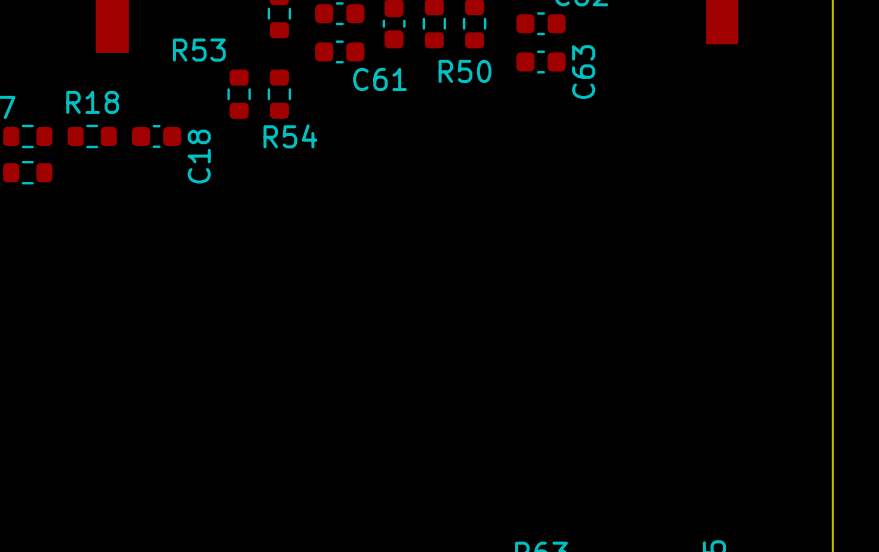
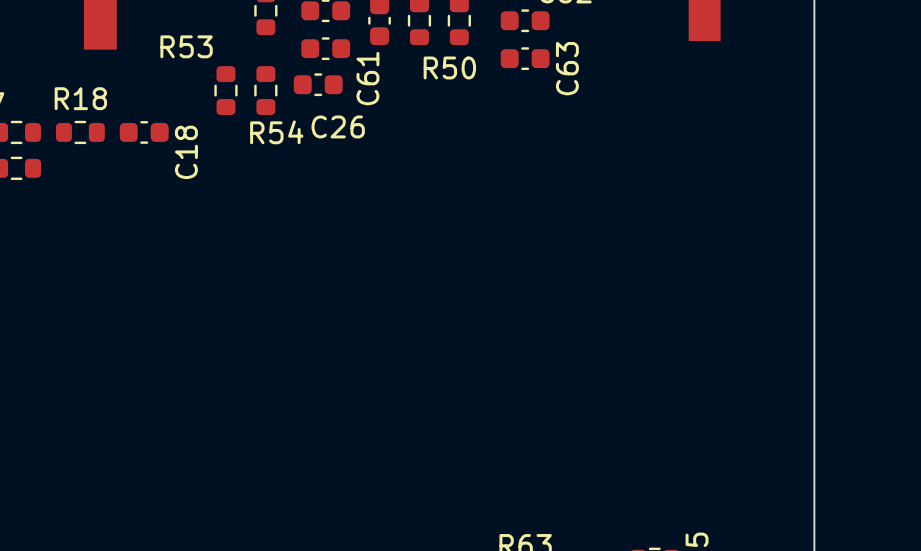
C61 name rotation: 0° (380, 79) -> 90° counterclockwise (367, 78)
C26: none -> (318, 84)

